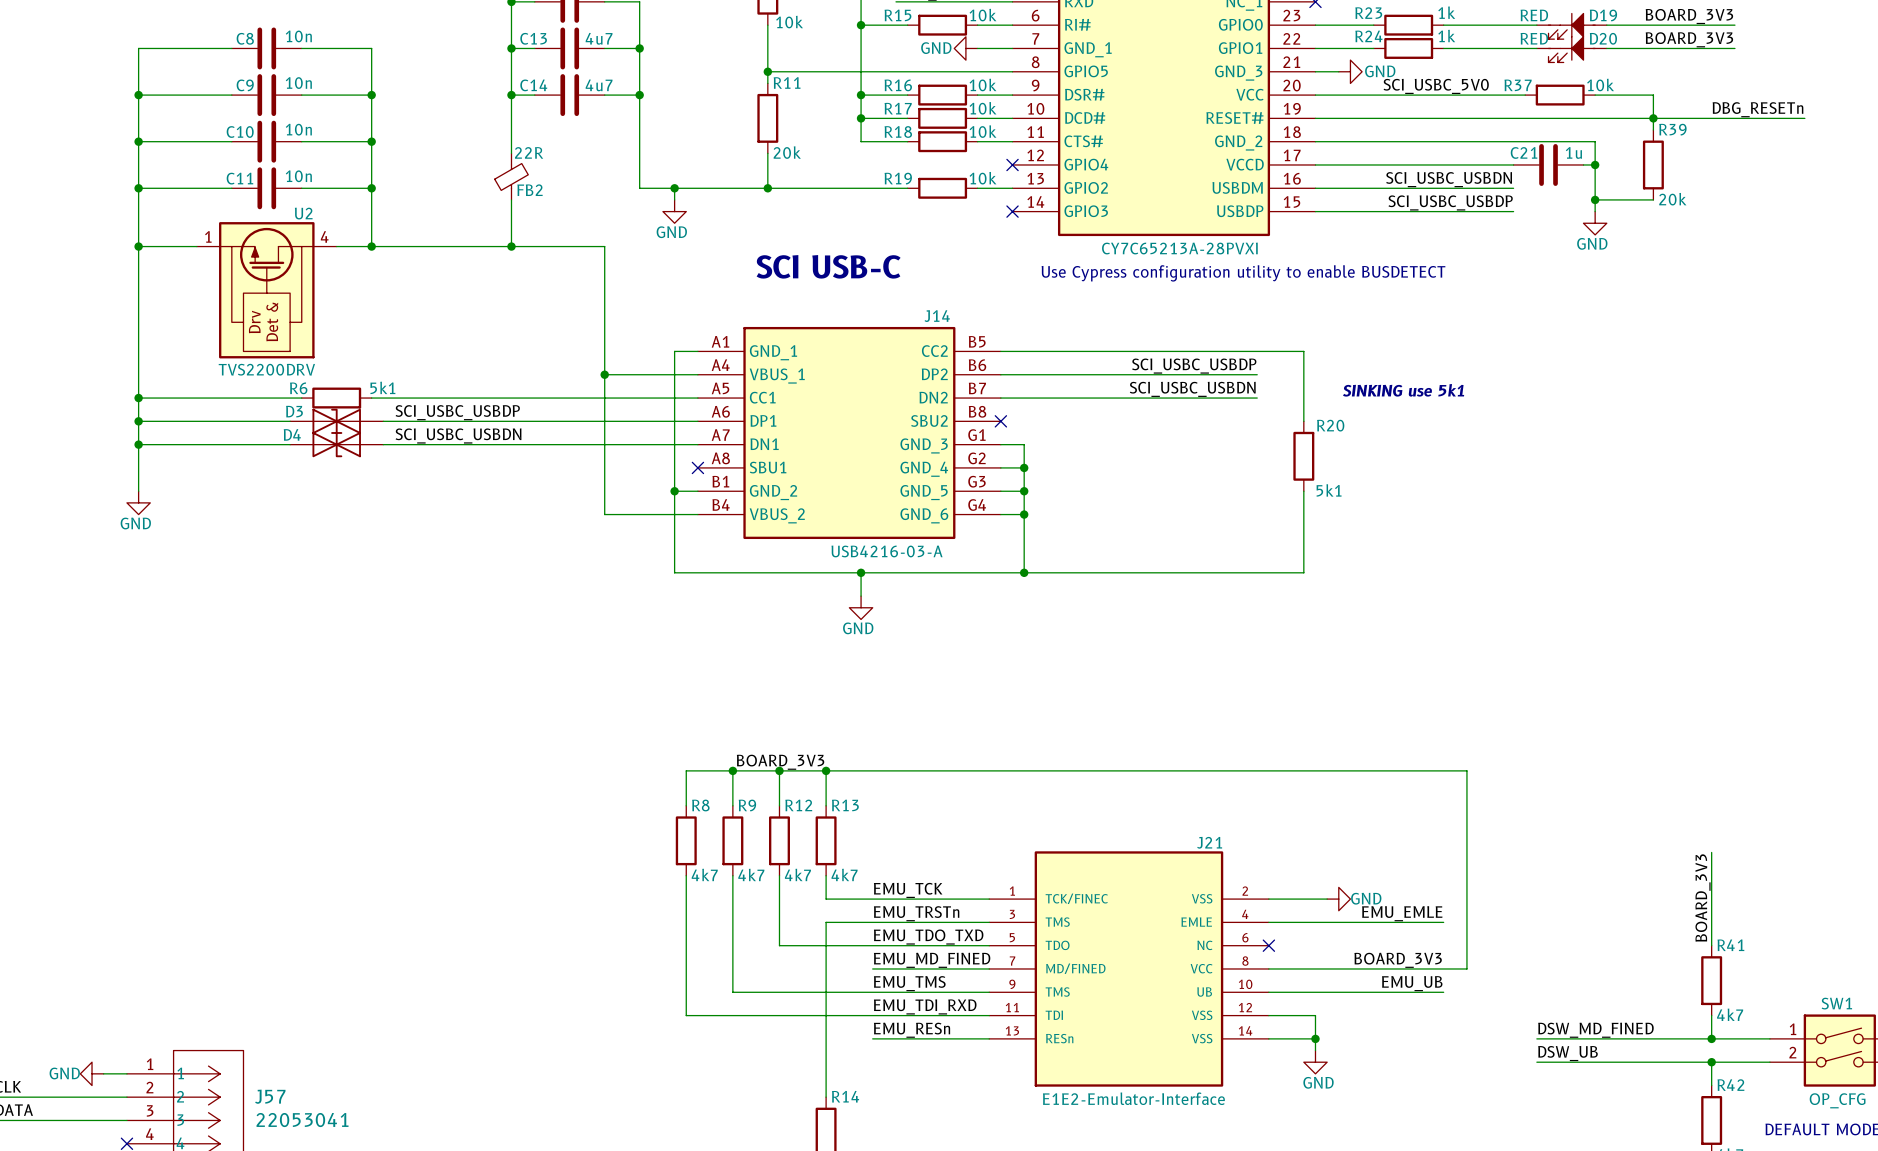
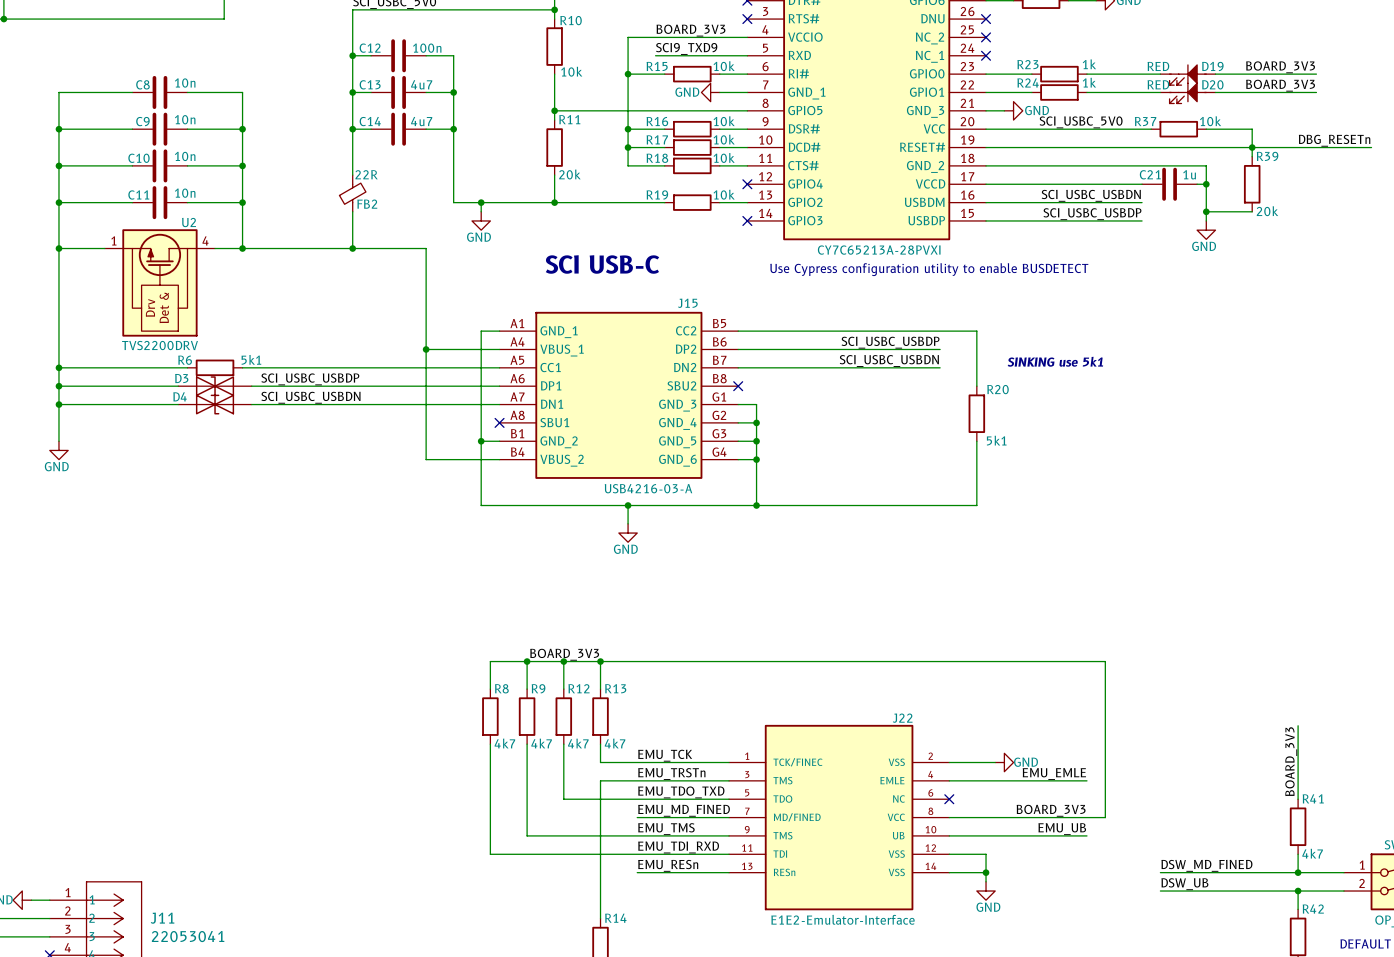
J14 name: J14 (937, 316) -> J15 (687, 303)
J21 name: J21 (1209, 842) -> J22 (902, 718)
J57 name: J57 (270, 1096) -> J11 (162, 918)

